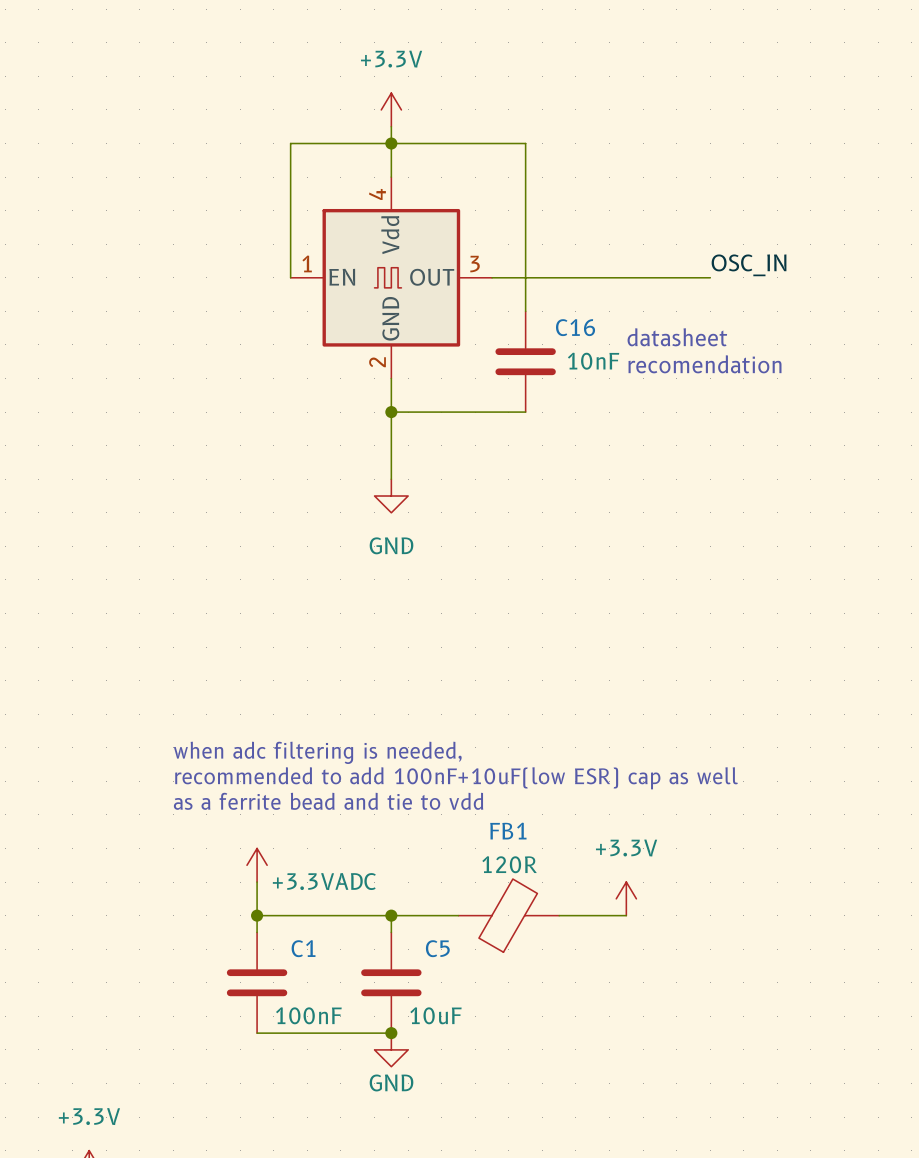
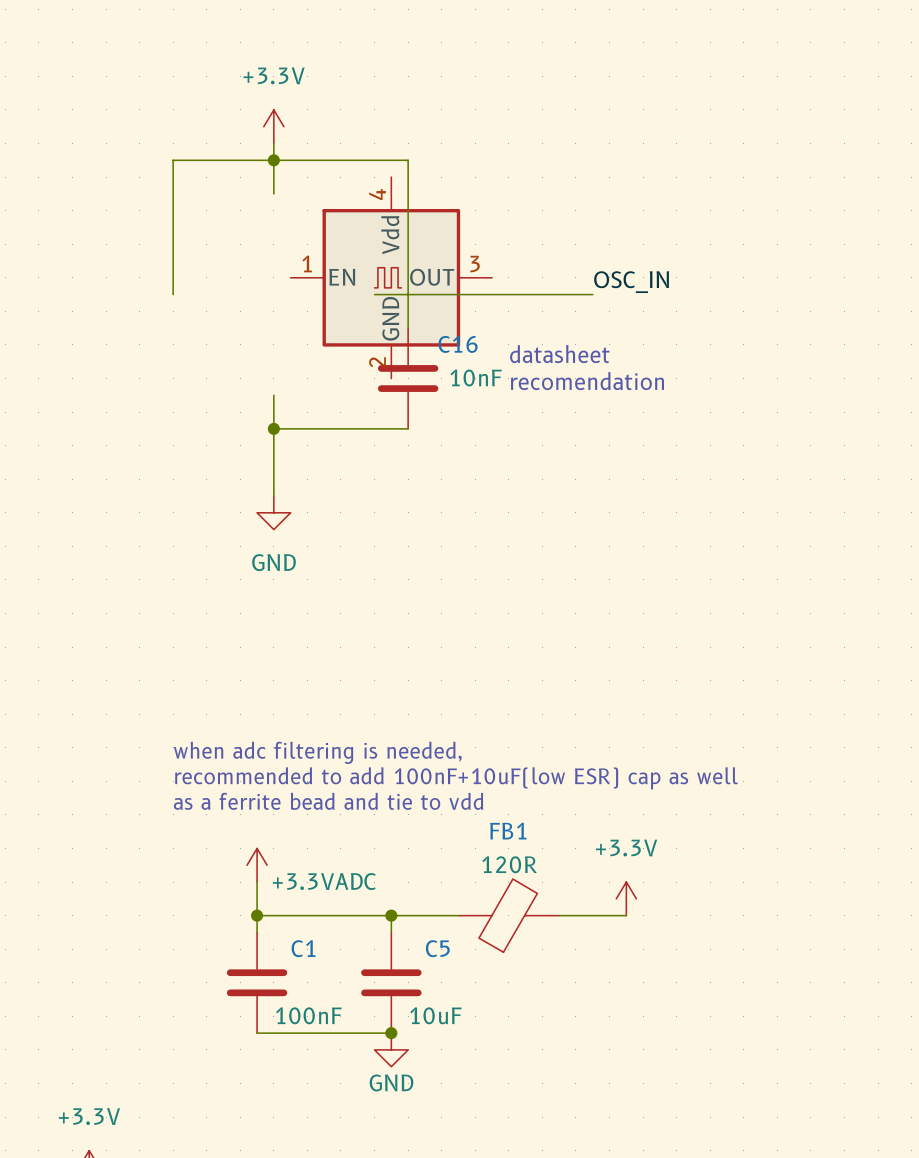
power symbol position: +3.3V (391, 109) -> +3.3V (273, 126)
wire: (391, 126) (391, 177) -> (273, 143) (273, 193)
junction: (391, 143) -> none
junction: none -> (273, 160)
label position: OSC_IN (749, 265) -> OSC_IN (631, 282)
wire: (290, 277) (290, 143) (525, 143) (525, 311) -> (173, 294) (173, 160) (408, 160) (408, 328)
wire: (492, 277) (710, 277) -> (374, 294) (592, 294)
text position: datasheet (677, 337) -> datasheet (559, 354)
C16 position: (525, 361) -> (408, 378)
text position: recomendation (705, 364) -> recomendation (587, 381)
wire: (391, 378) (391, 479) -> (273, 395) (273, 496)
wire: (391, 412) (525, 412) -> (273, 428) (408, 428)
junction: (391, 412) -> none
junction: none -> (273, 428)
power symbol position: GND (391, 496) -> GND (273, 512)

